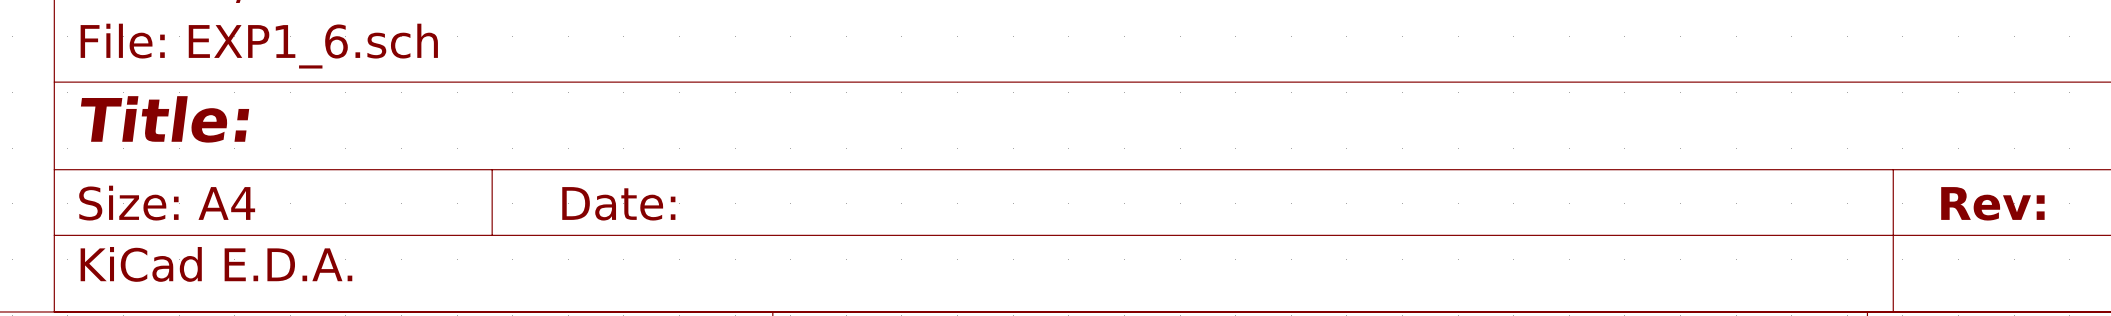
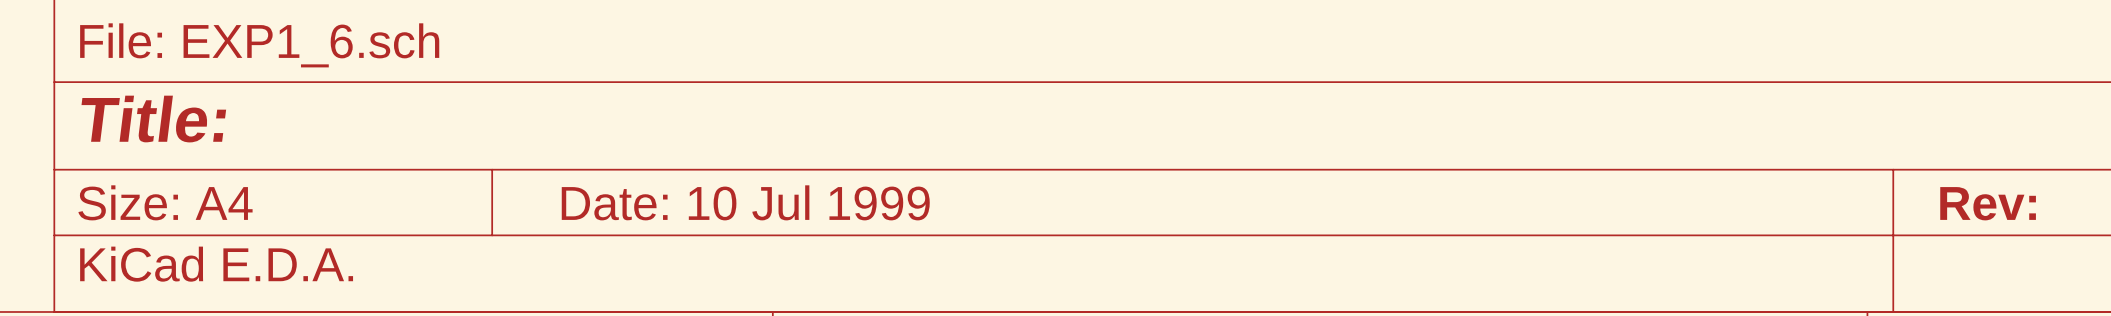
title block: Date: (618, 203) -> Date: 10 Jul 1999 (745, 202)

